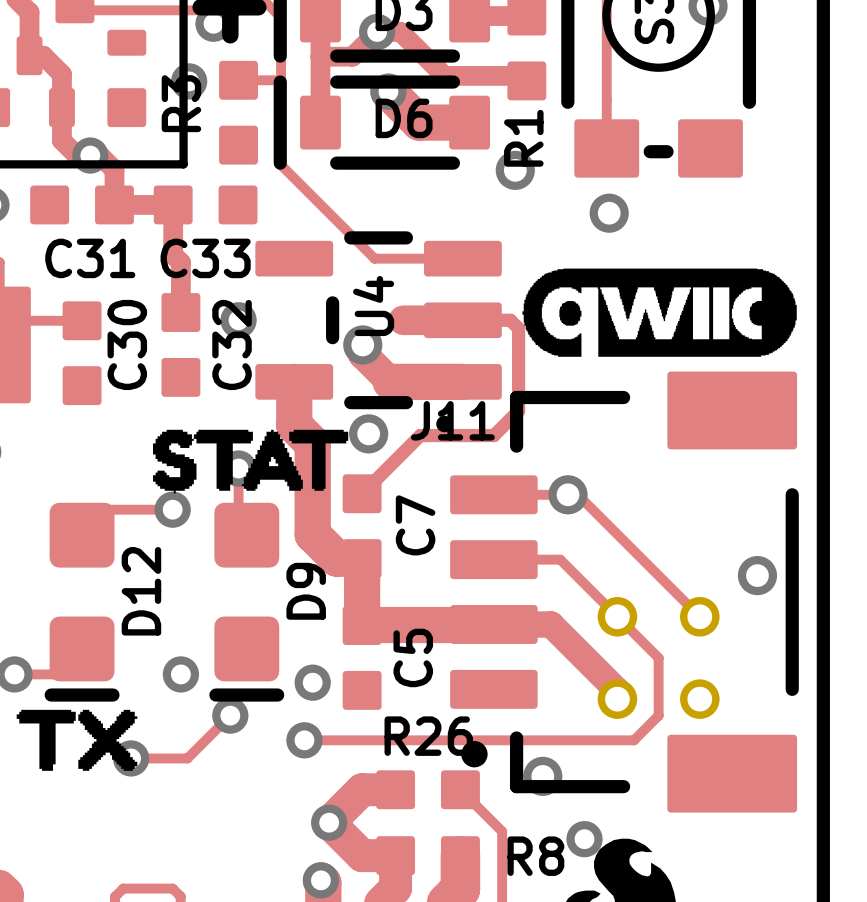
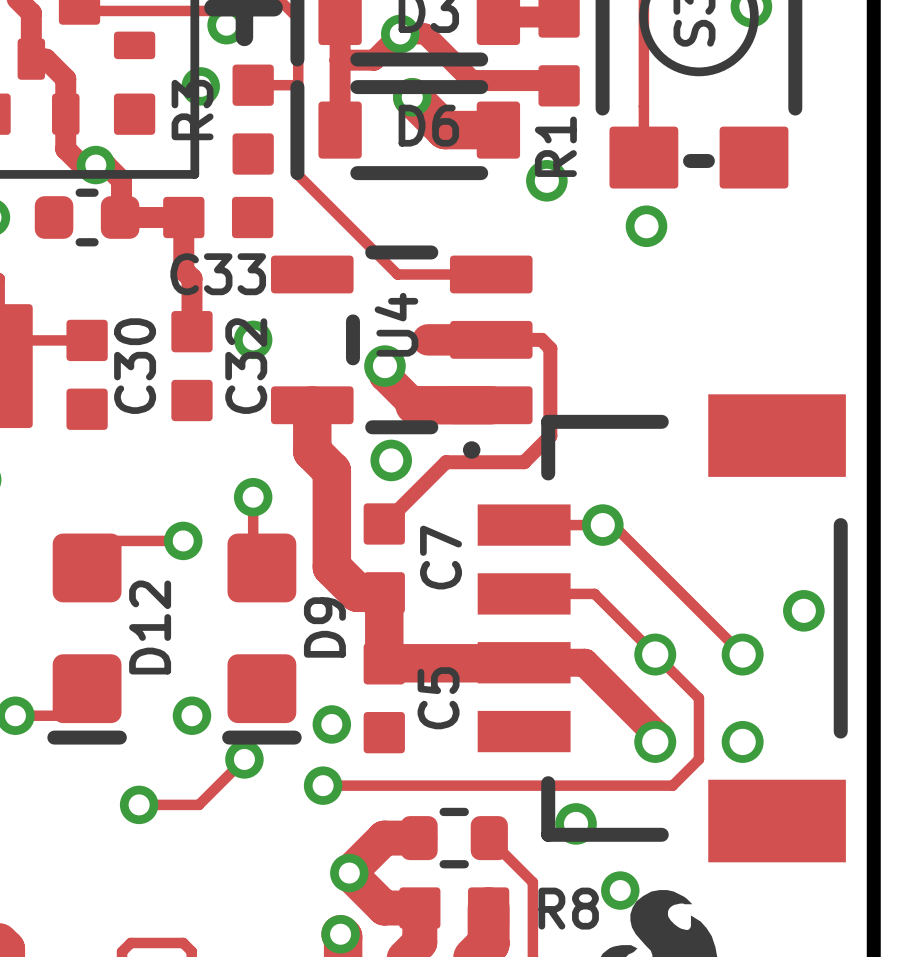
C31: (82, 204) -> none
part: none -> (87, 217)
drawing: [522, 268, 797, 357] -> none
drawing: [153, 429, 349, 494] -> none
J11: (624, 592) -> none
part: none -> (662, 628)
drawing: [16, 709, 138, 771] -> none
R26: (428, 789) -> none
part: none -> (454, 838)

